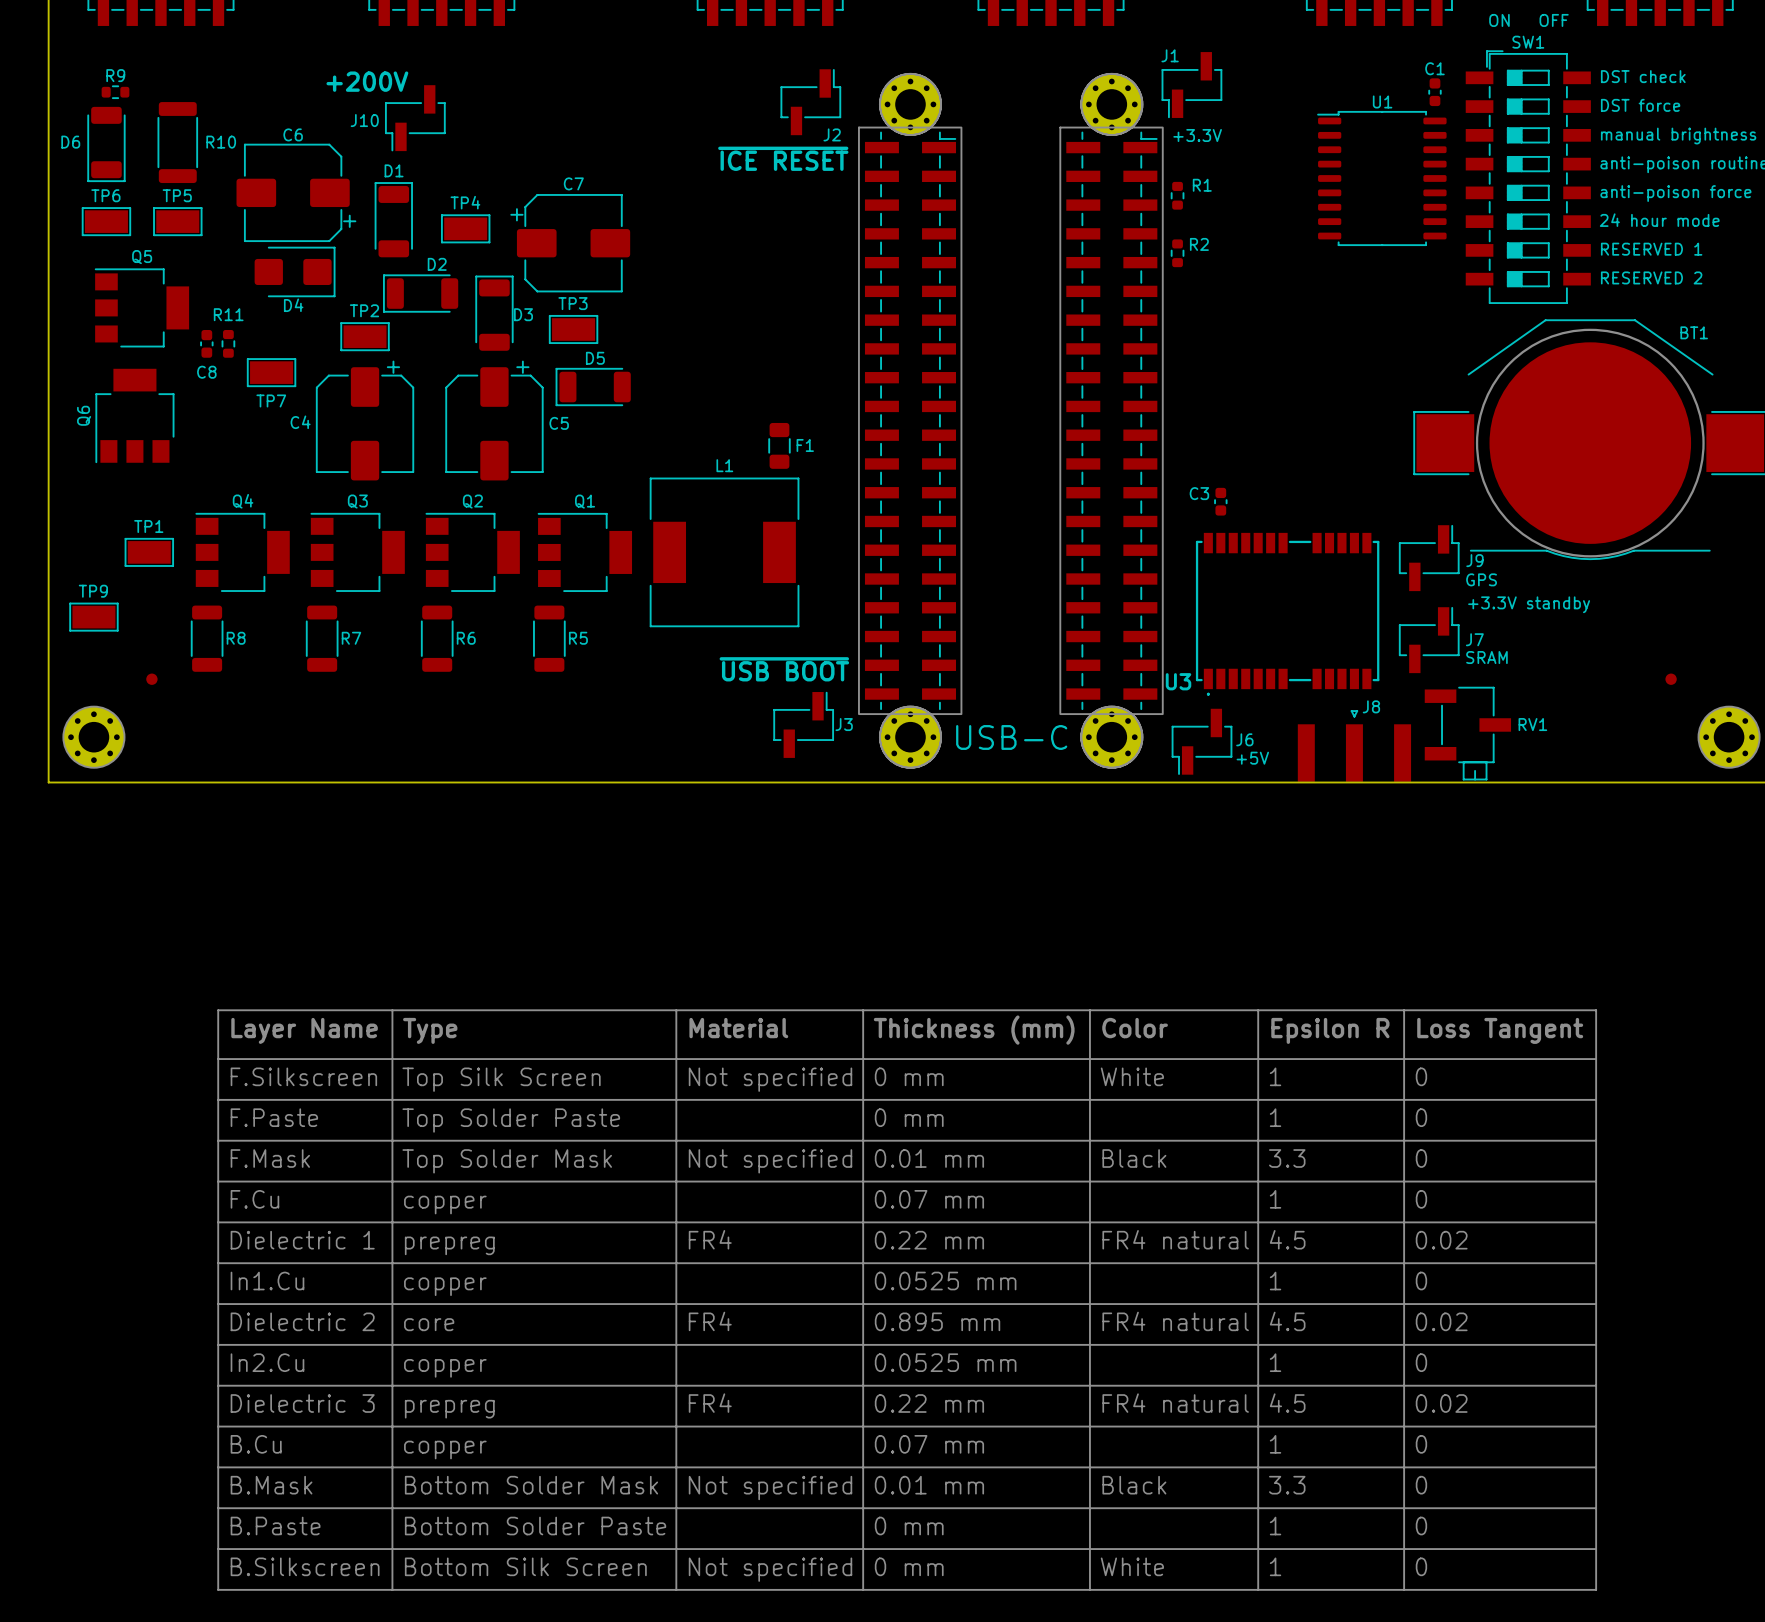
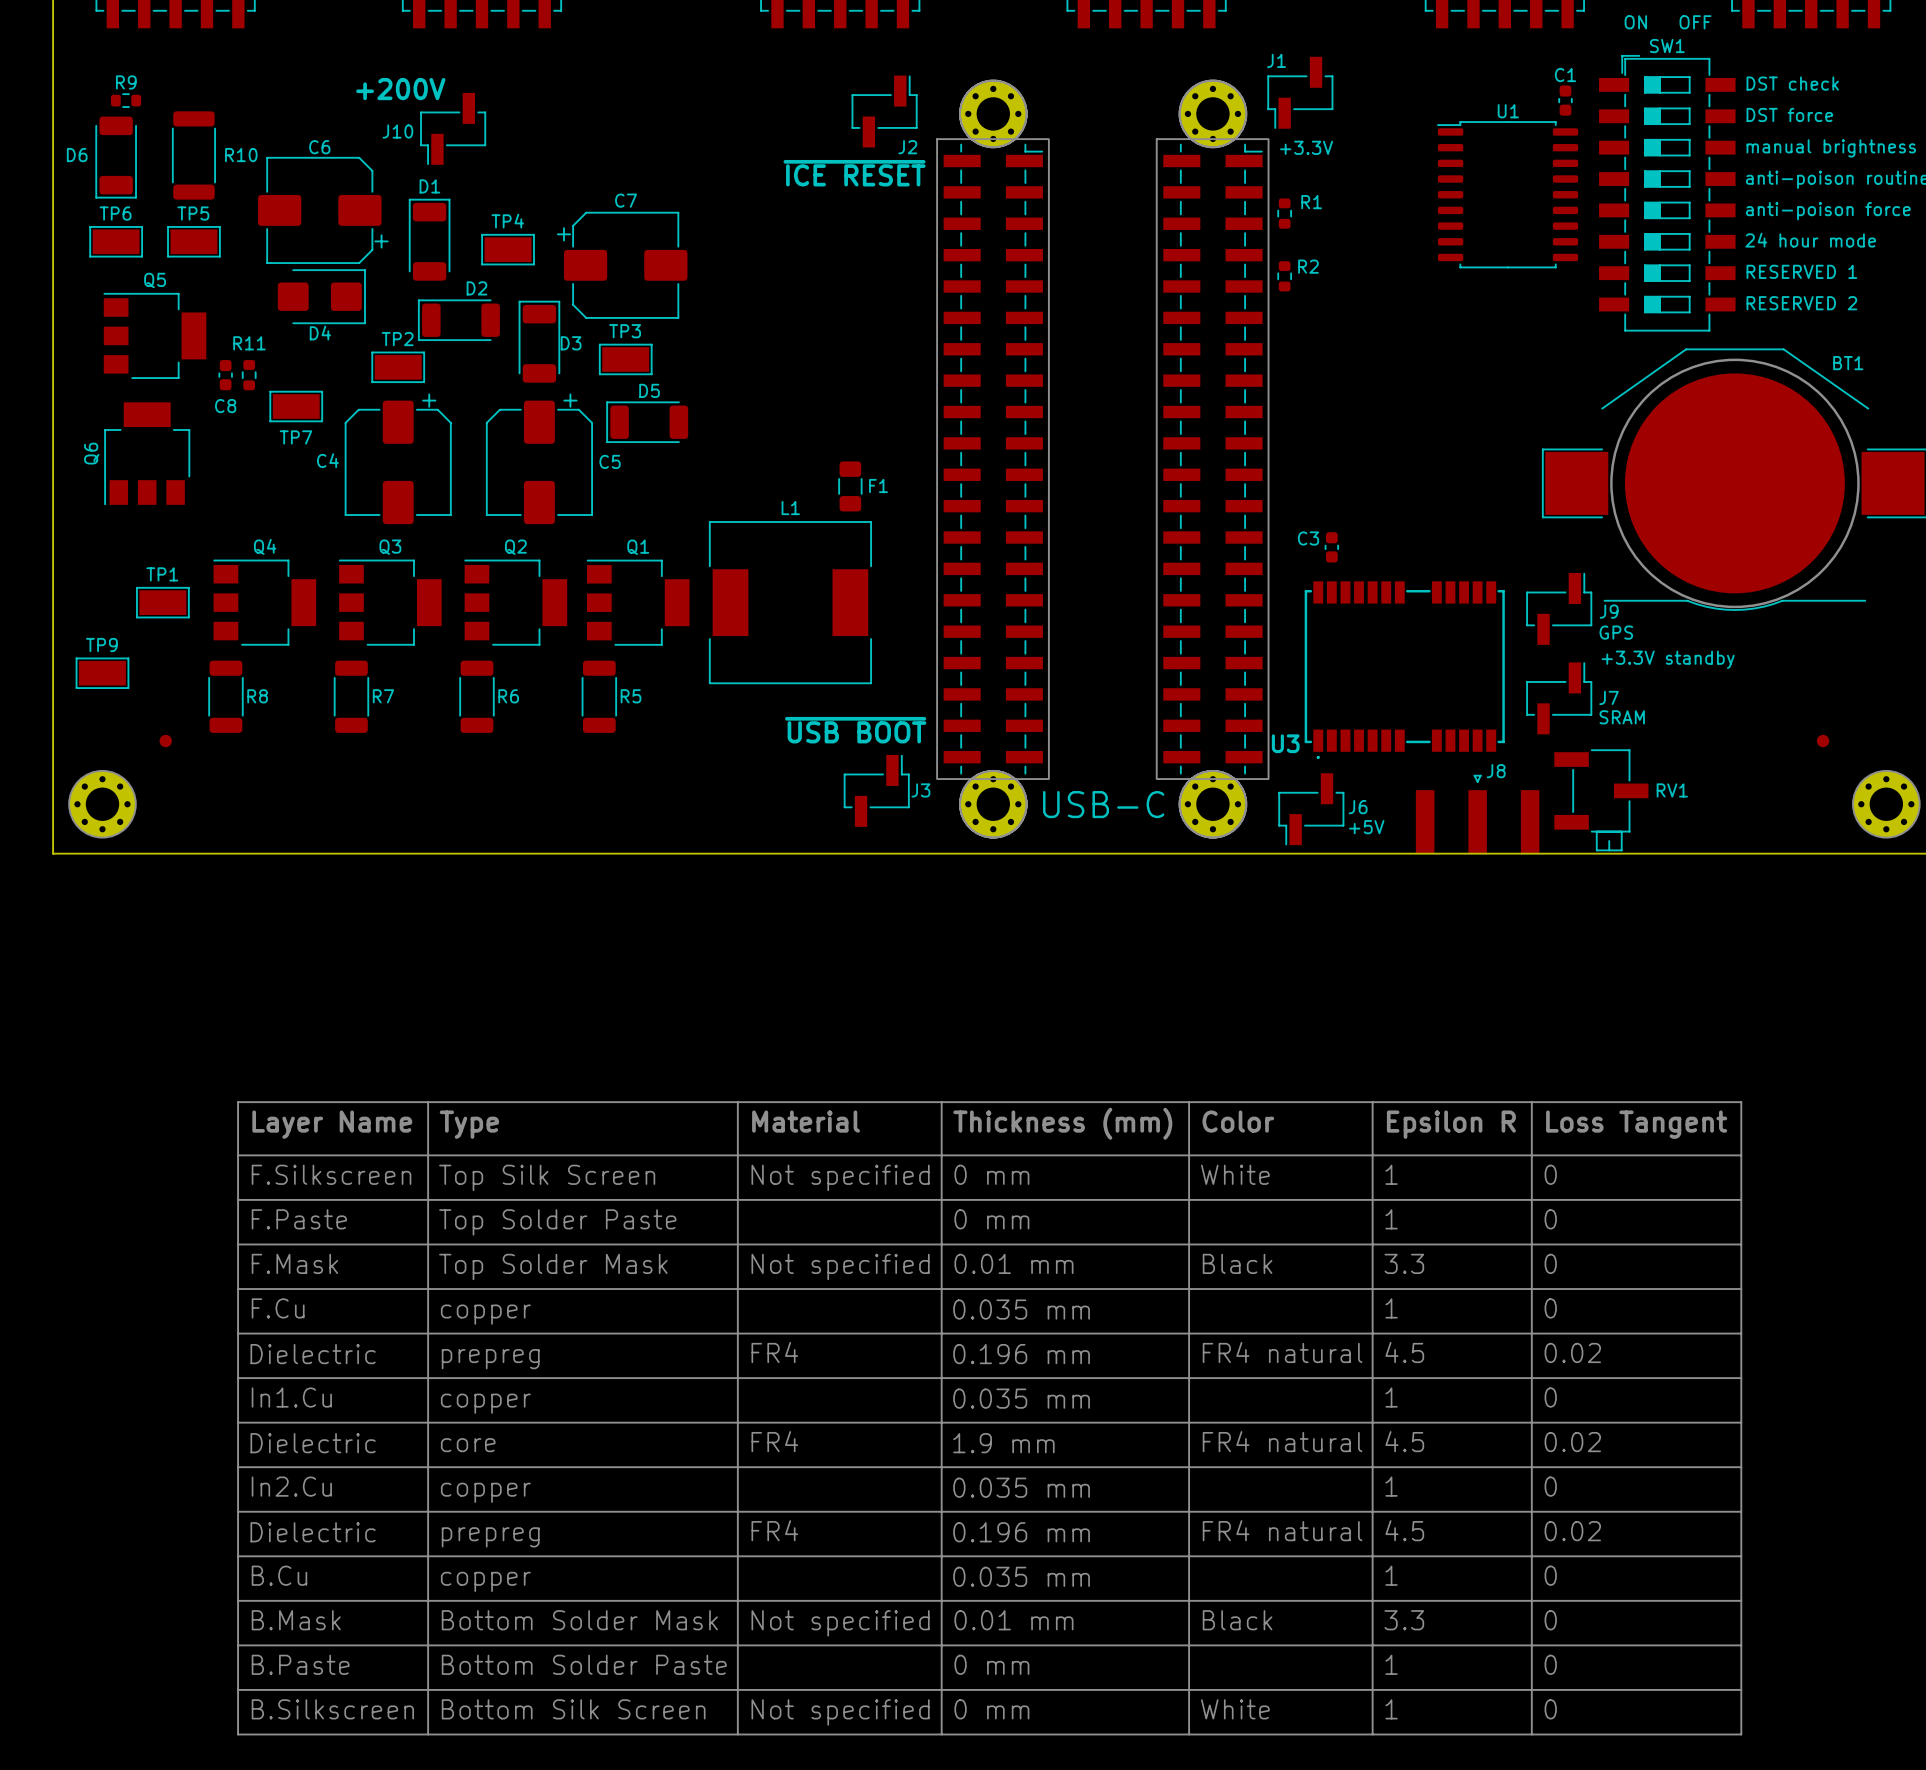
text: 0.07 mm (929, 1199) -> 0.035 mm (1021, 1309)
text: Dielectric 1 (302, 1240) -> Dielectric (313, 1354)
text: 0.22 mm (929, 1240) -> 0.196 mm (1021, 1354)
text: 0.0525 mm (945, 1281) -> 0.035 mm (1021, 1398)
text: Dielectric 2 (302, 1321) -> Dielectric (313, 1443)
text: 0.895 mm (937, 1321) -> 1.9 mm (1003, 1443)
text: 0.0525 mm (945, 1362) -> 0.035 mm (1021, 1487)
text: Dielectric 3 (302, 1403) -> Dielectric (313, 1532)
text: 0.22 mm (929, 1403) -> 0.196 mm (1021, 1532)
text: 0.07 mm (929, 1444) -> 0.035 mm (1021, 1576)

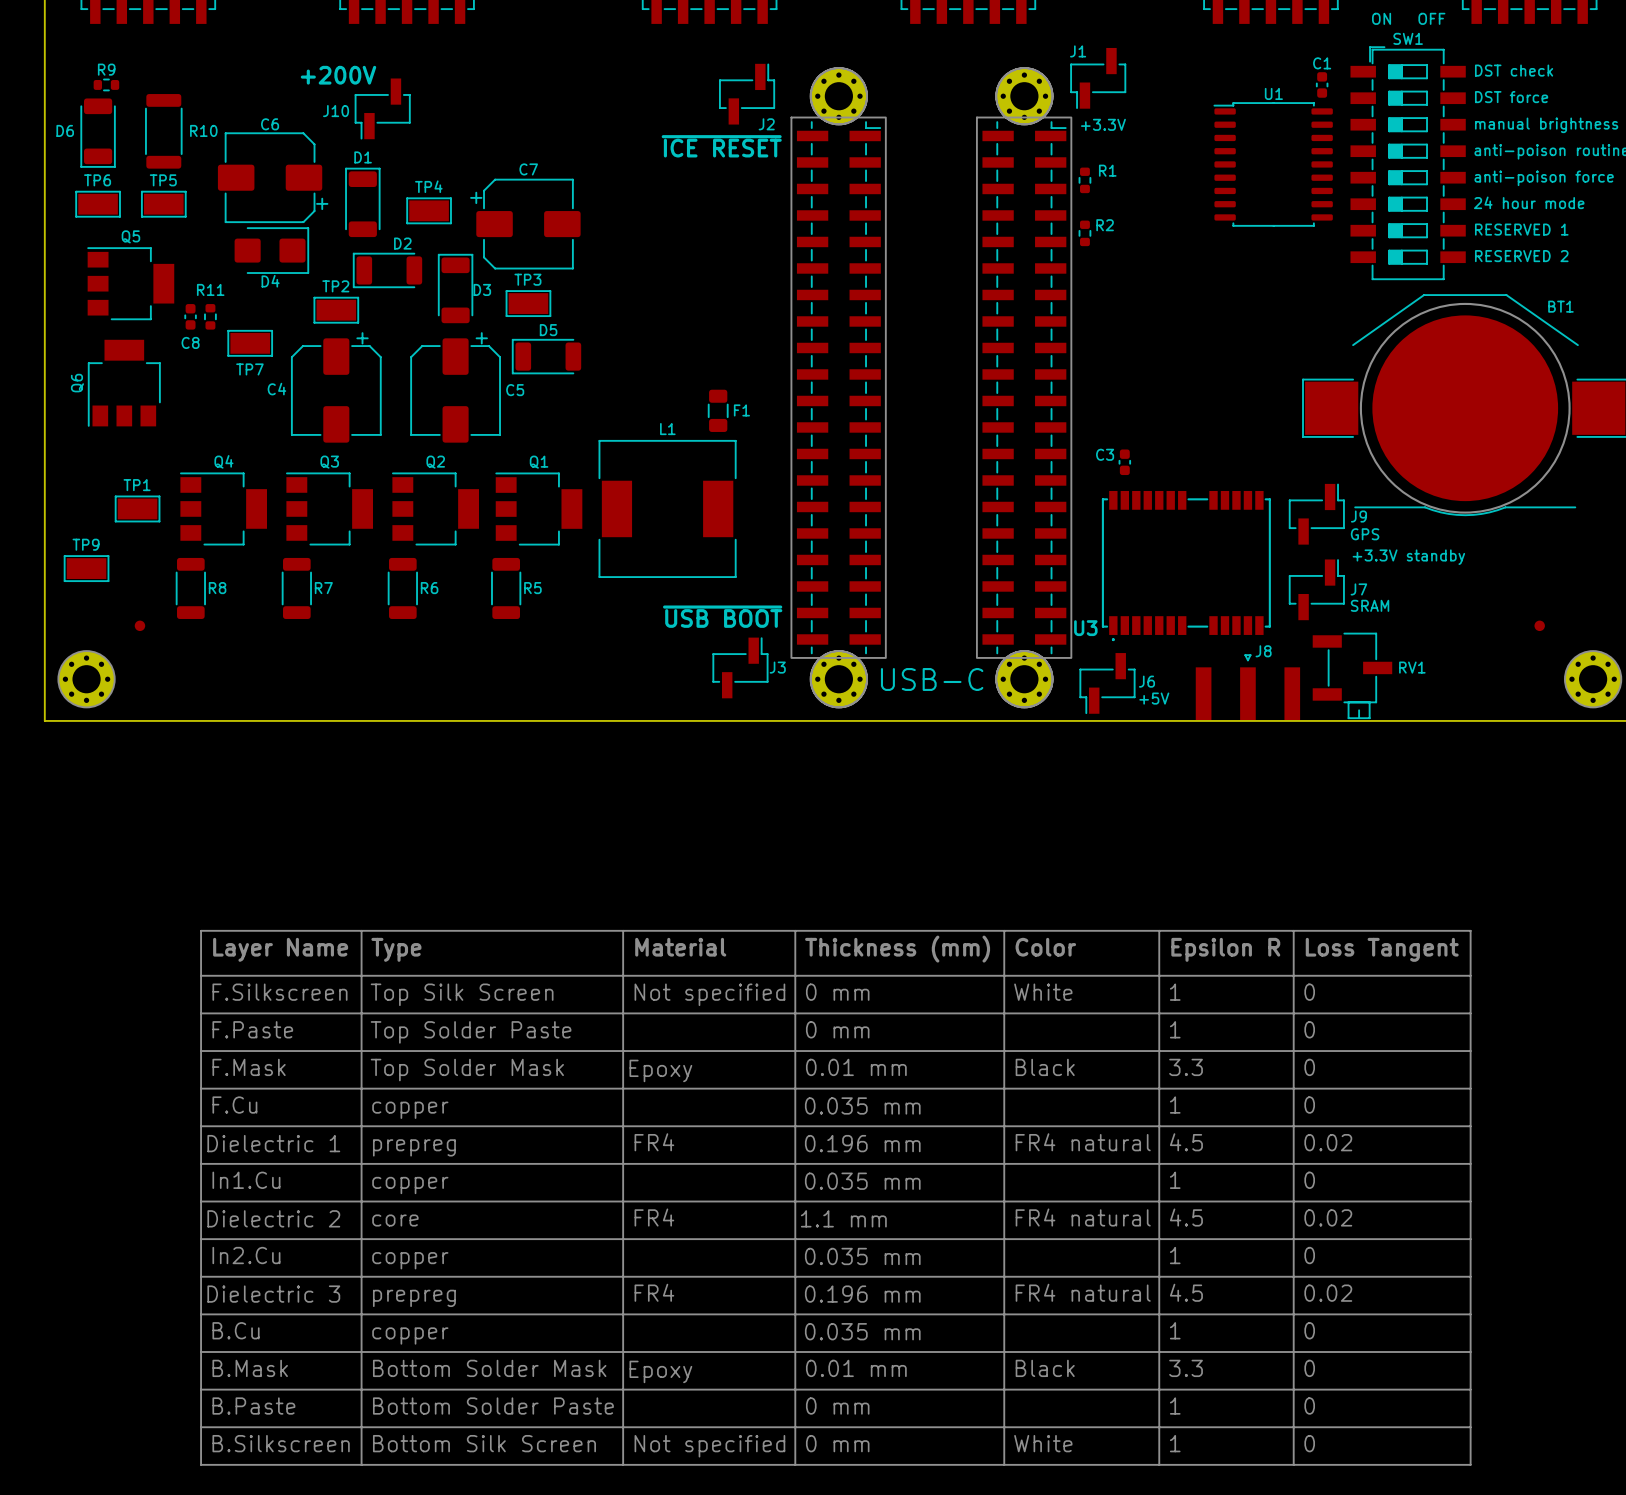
text: Not specified (840, 1266) -> Epoxy (660, 1070)
text: Dielectric (313, 1354) -> Dielectric 1 (273, 1143)
text: Dielectric (313, 1443) -> Dielectric 2 (273, 1218)
text: 1.9 mm (1003, 1443) -> 1.1 mm (843, 1218)
text: Dielectric (313, 1532) -> Dielectric 3 (273, 1294)
text: Not specified (840, 1623) -> Epoxy (660, 1371)

